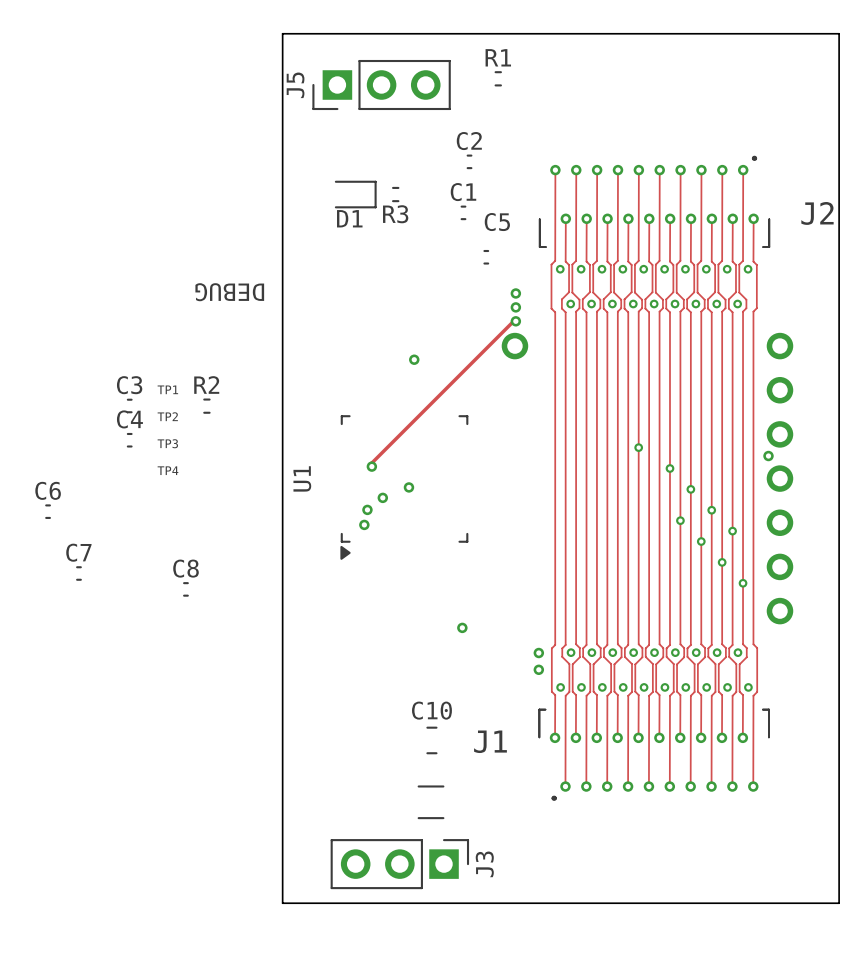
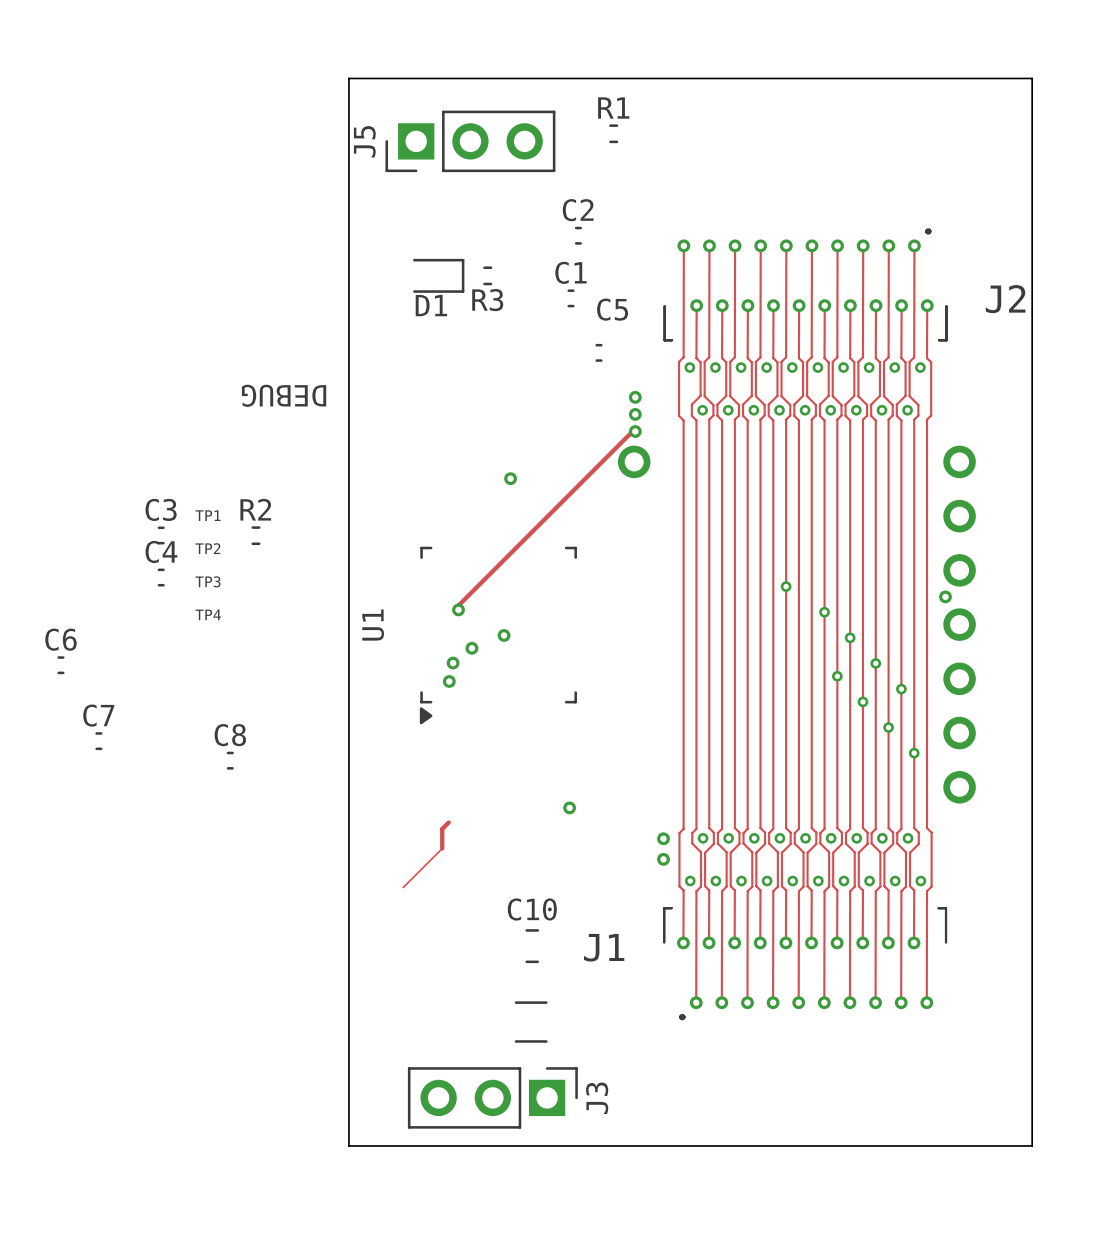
track: none -> (448, 822) (442, 828) (442, 848) (403, 887)

